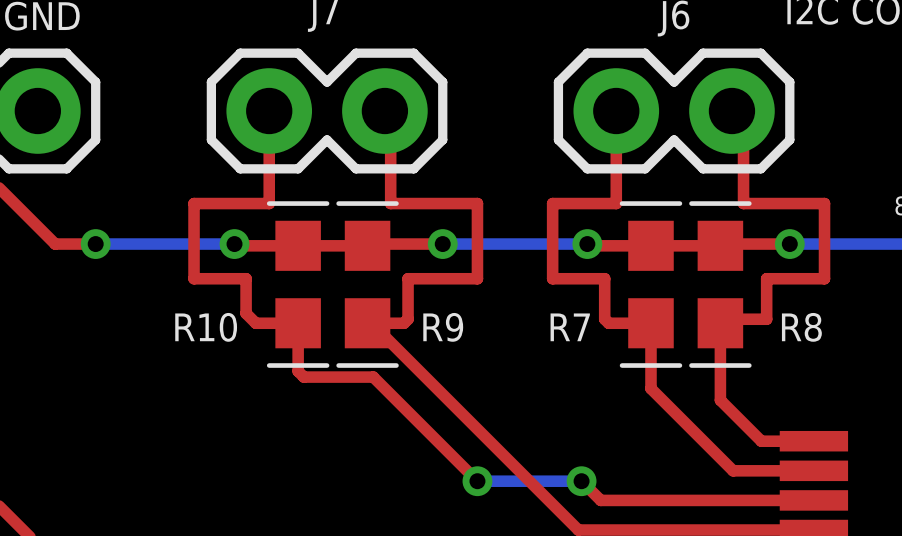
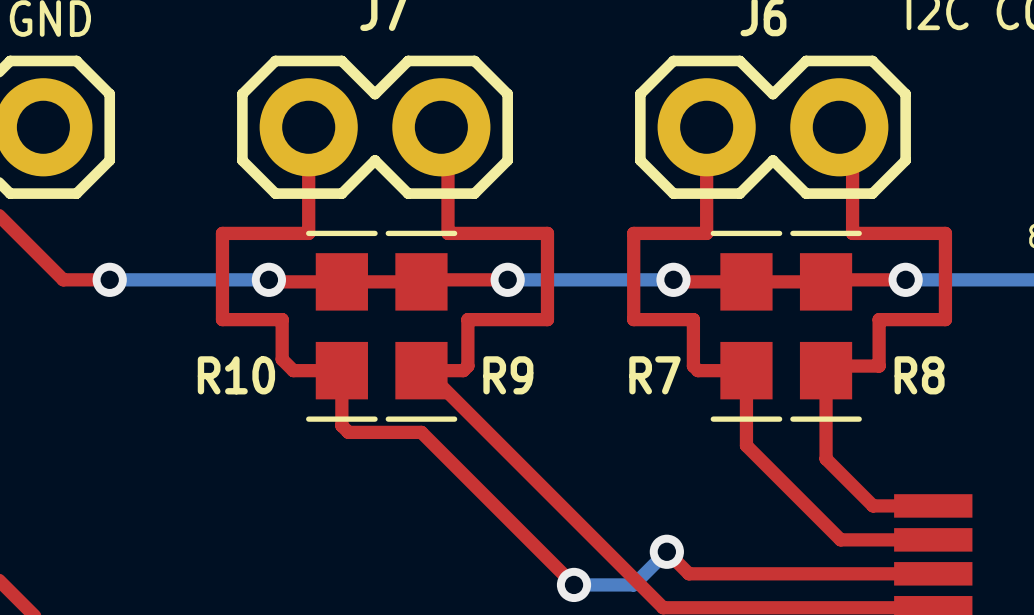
top track: (367, 377) (373, 377) (477, 481) -> (421, 432) (574, 584)
bottom track: (477, 481) (581, 481) -> (574, 584) (633, 584) (666, 551)
via position: (477, 481) -> (574, 584)

